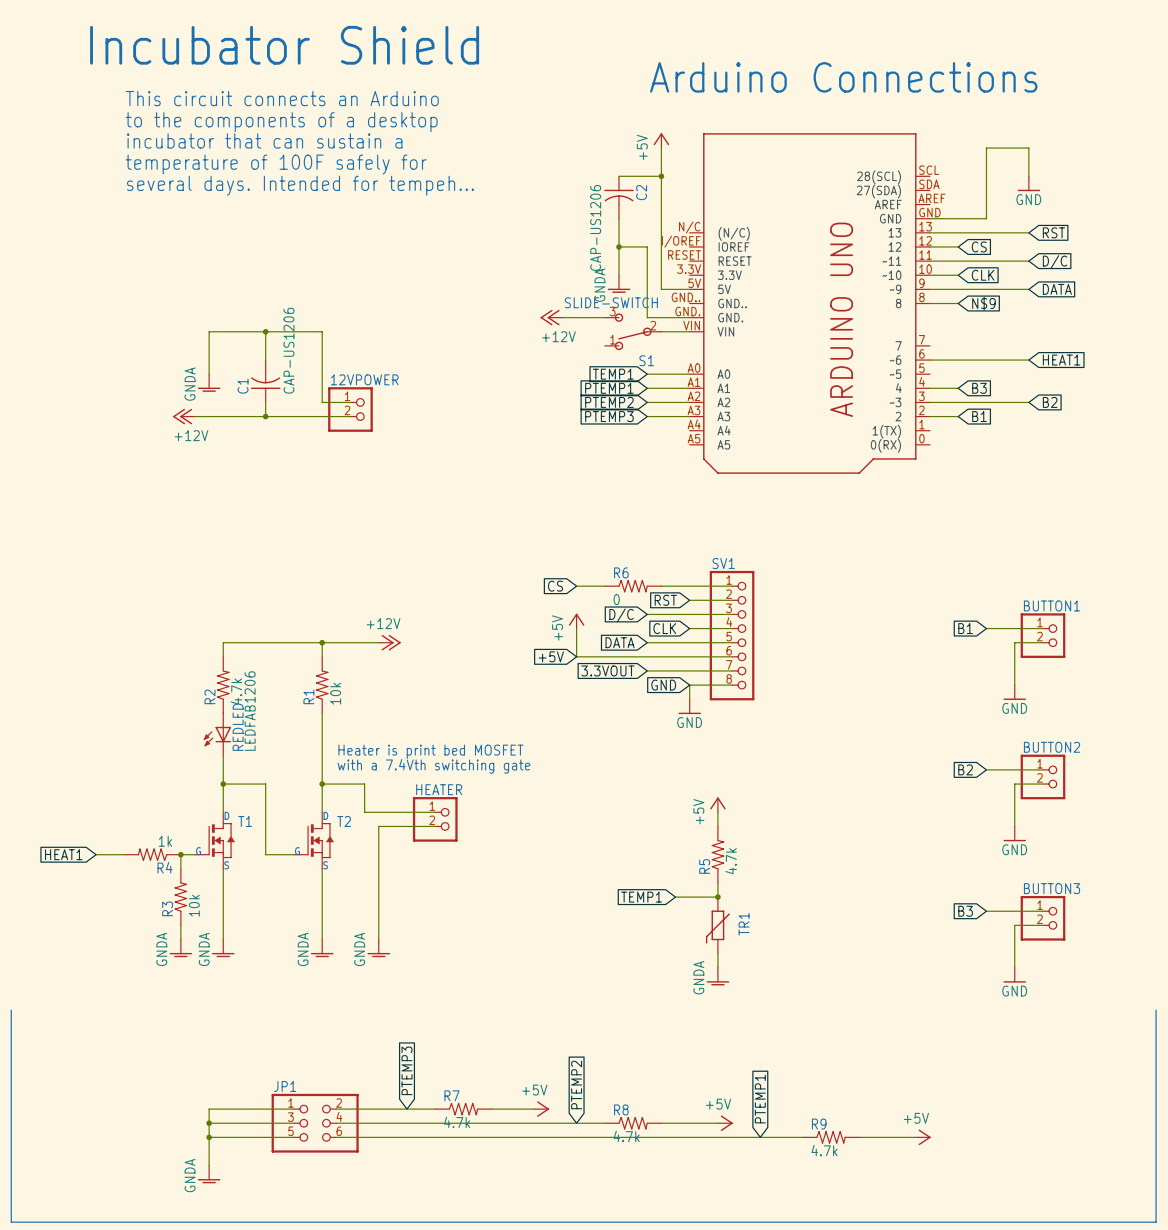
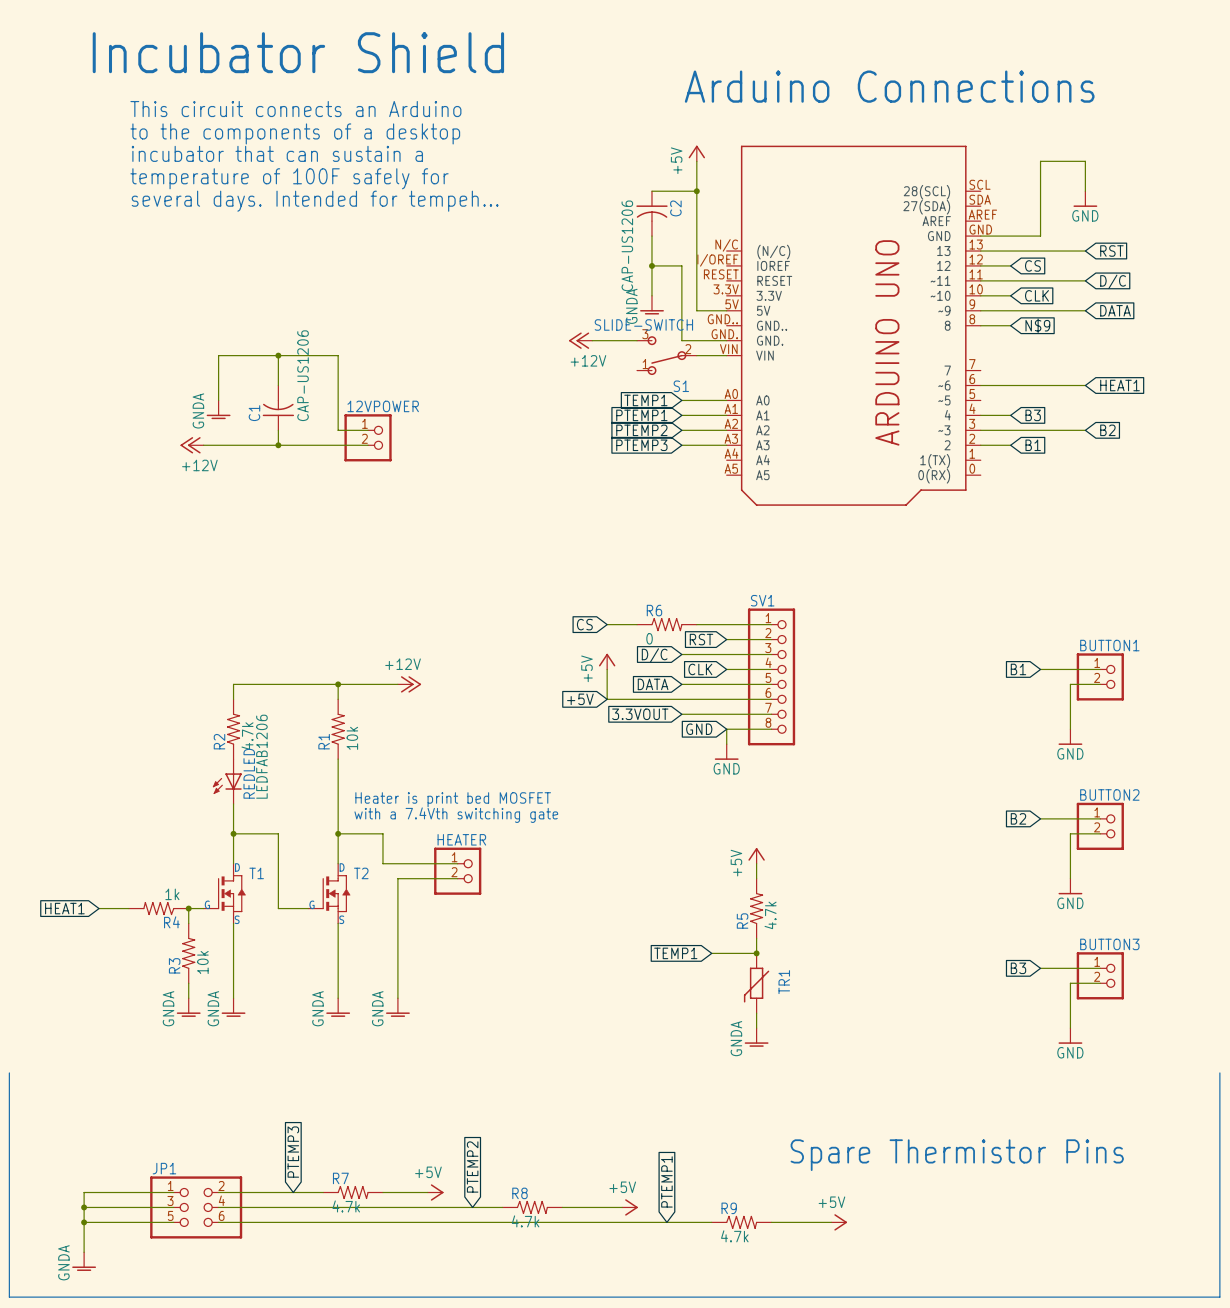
global label position: PTEMP3 (407, 1070) -> PTEMP3 (293, 1152)
global label position: PTEMP2 (576, 1084) -> PTEMP2 (472, 1167)
text: none -> Spare Thermistor Pins (957, 1155)
global label position: PTEMP1 (760, 1099) -> PTEMP1 (666, 1181)
wire: (293, 1109) (209, 1109) (209, 1165) -> (173, 1192) (84, 1192) (84, 1252)
wire: (336, 1109) (435, 1109) -> none
R7 position: (463, 1109) -> (353, 1192)
wire: (491, 1109) (534, 1109) -> none
power symbol position: +5V (541, 1109) -> +5V (629, 1207)
junction: (209, 1123) -> none
JP1 position: (315, 1123) -> (196, 1207)
wire: (407, 1123) (604, 1123) -> none
power symbol: none -> +5V (435, 1192)
R8 position: (633, 1123) -> (532, 1207)
wire: (661, 1123) (717, 1123) -> none
power symbol: +5V (725, 1123) -> none
wire: none -> (84, 1207) (173, 1207)
junction: none -> (84, 1207)
junction: (209, 1137) -> none
wire: none -> (308, 1207) (353, 1207)
wire: (590, 1137) (802, 1137) -> none
R9 position: (831, 1137) -> (741, 1222)
wire: (859, 1137) (915, 1137) -> (771, 1222) (831, 1222)
power symbol: +5V (923, 1137) -> none
wire: none -> (84, 1222) (173, 1222)
junction: none -> (84, 1222)
wire: none -> (218, 1222) (711, 1222)
power symbol: none -> +5V (839, 1222)
power symbol position: GNDA (209, 1174) -> GNDA (84, 1261)

